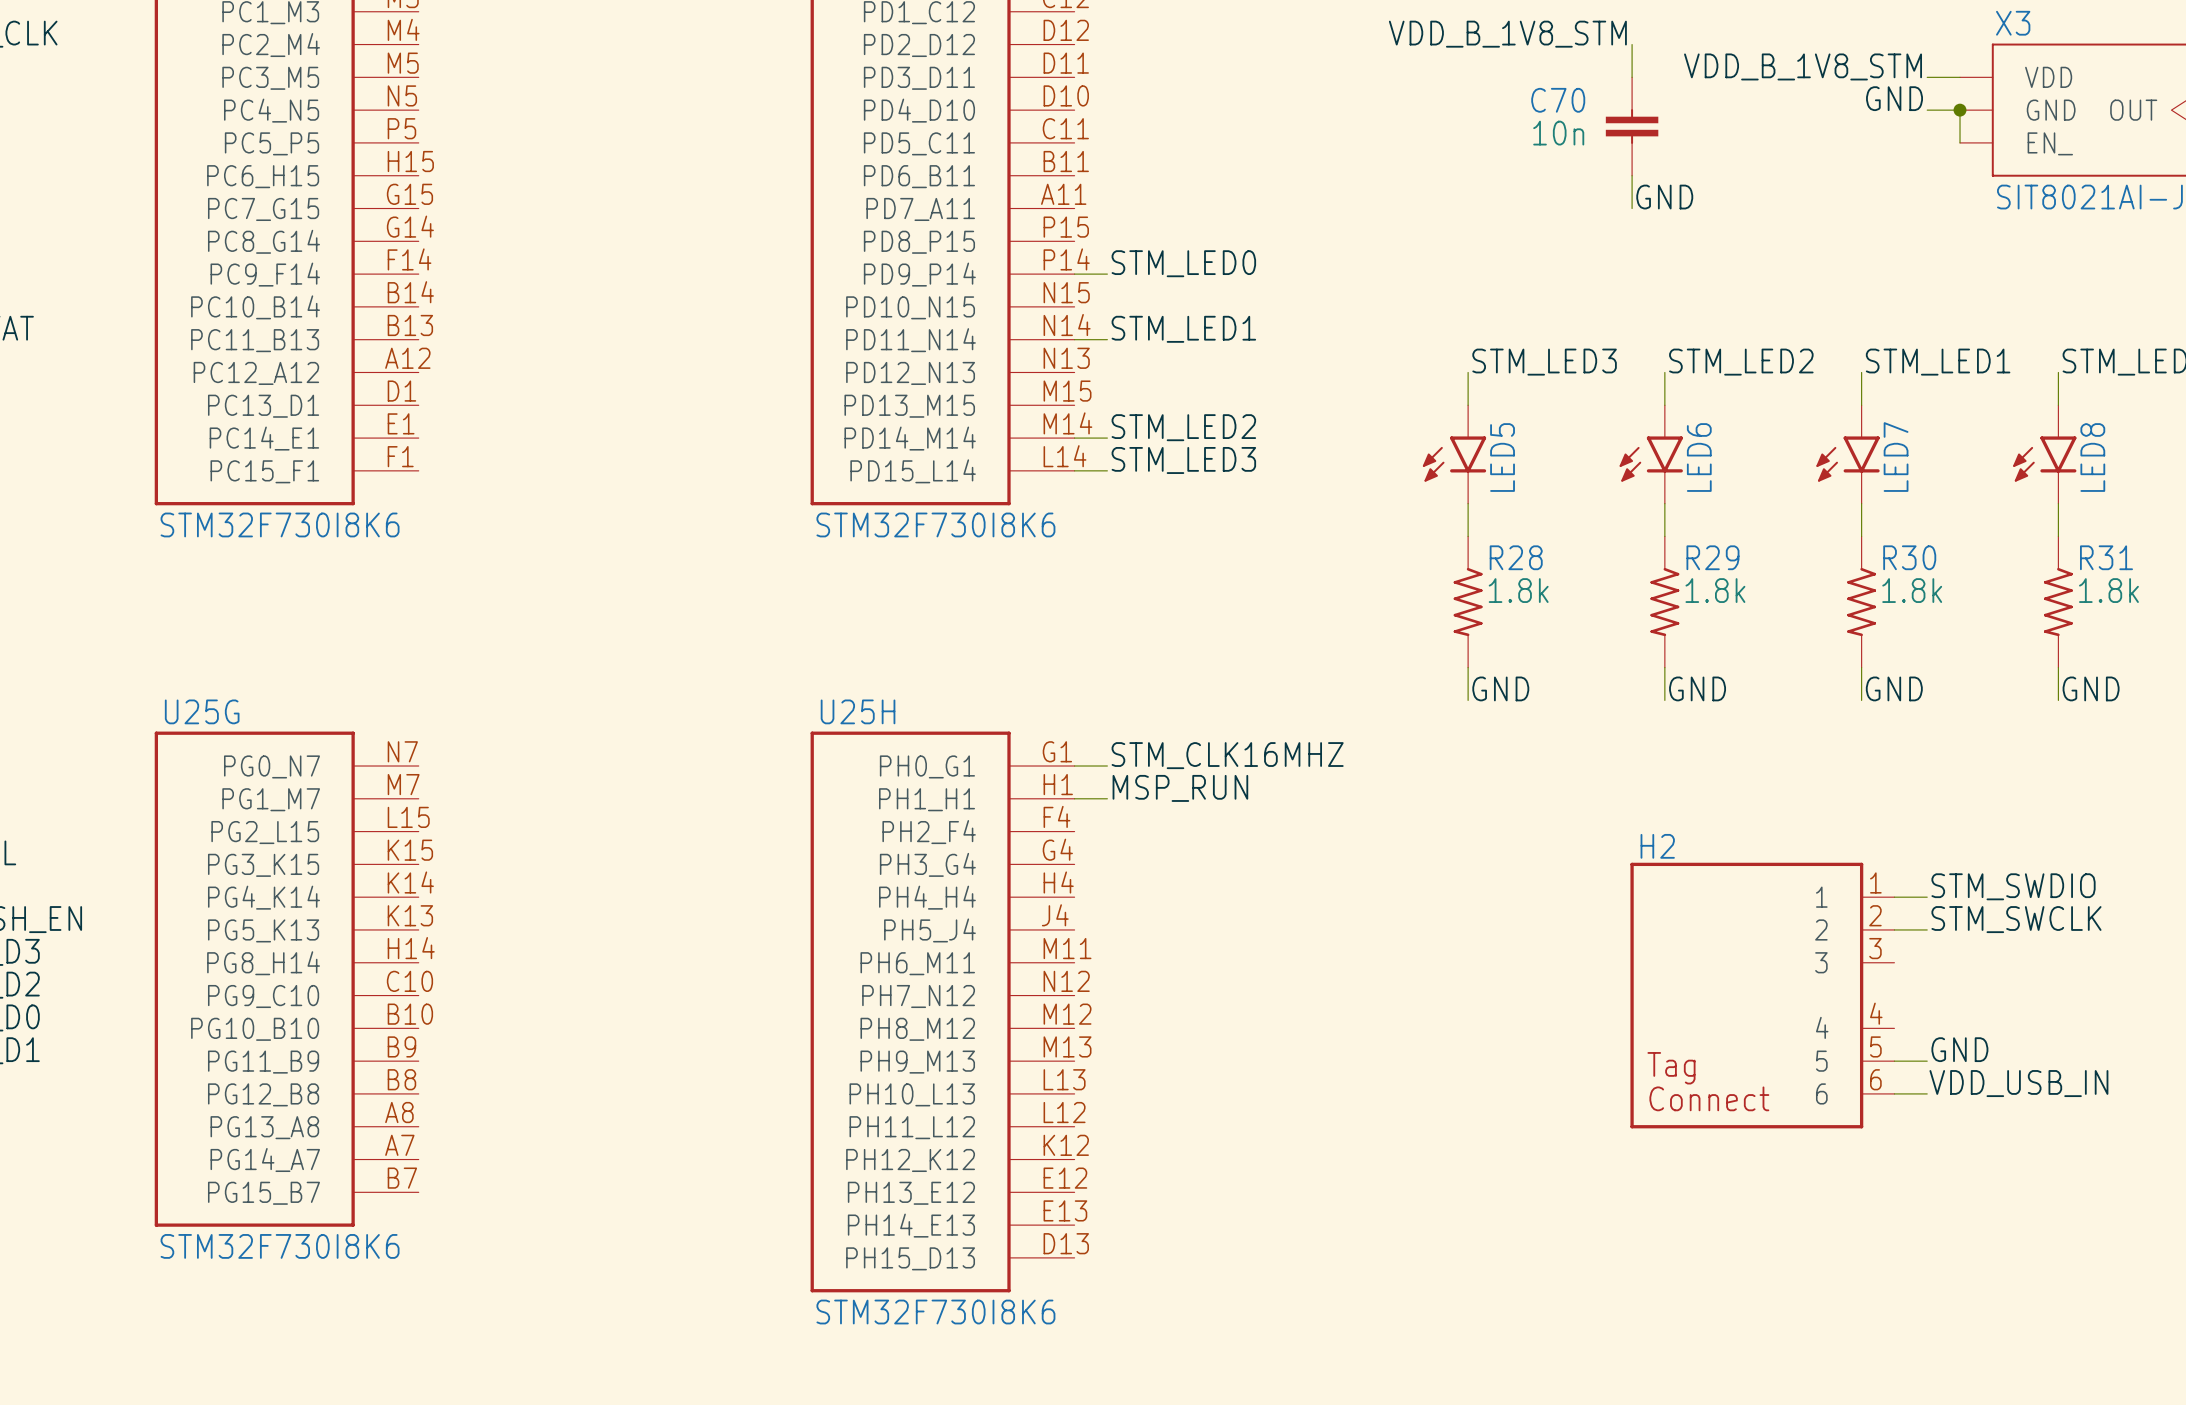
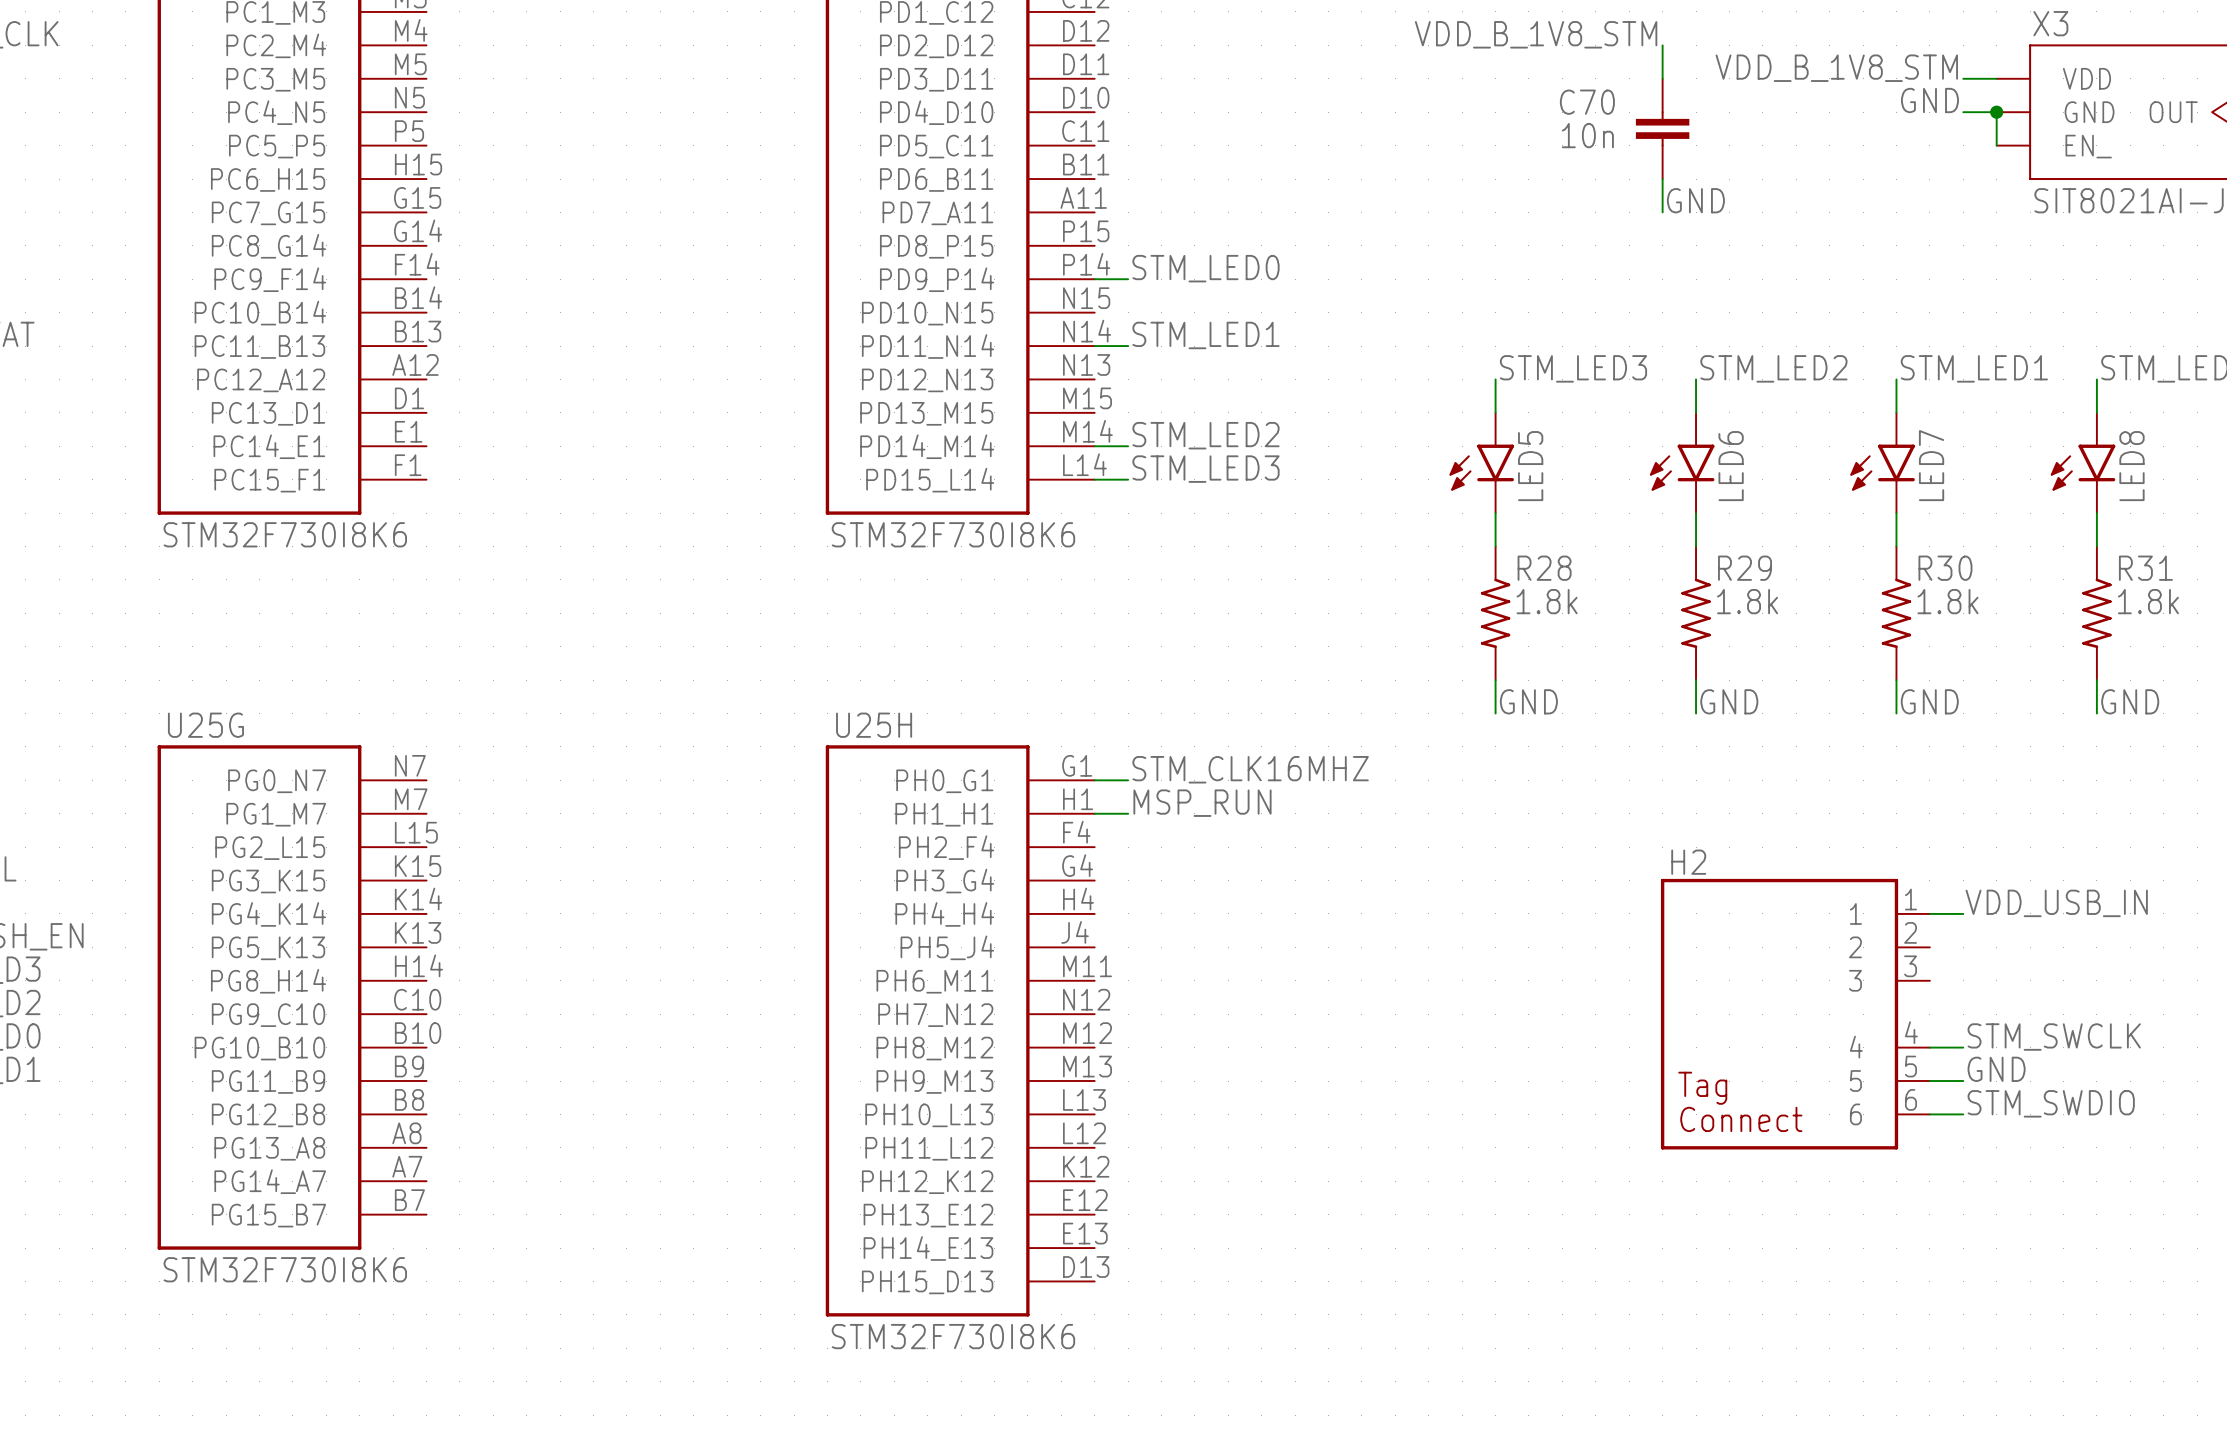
label: STM_SWDIO (2013, 886) -> VDD_USB_IN (2056, 903)
label position: STM_SWCLK (2016, 919) -> STM_SWCLK (2054, 1037)
wire: (1894, 929) (1927, 929) -> (1929, 1047) (1963, 1047)
label: VDD_USB_IN (2018, 1083) -> STM_SWDIO (2051, 1103)

